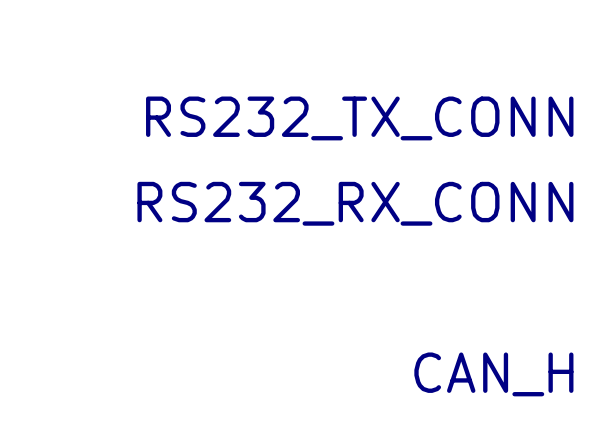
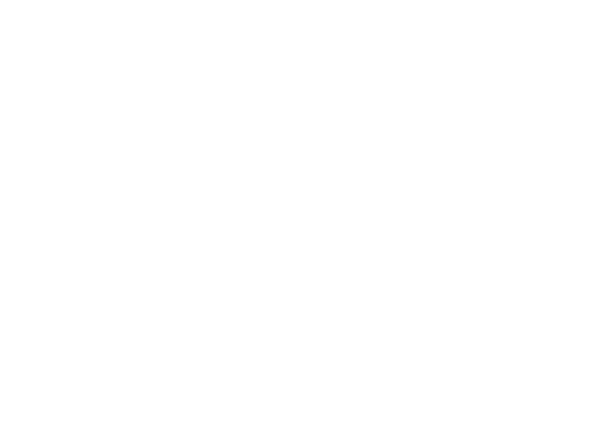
text: RS232_TX_CONN (359, 118) -> none
text: RS232_RX_CONN (355, 203) -> none
text: CAN_H (493, 374) -> none

